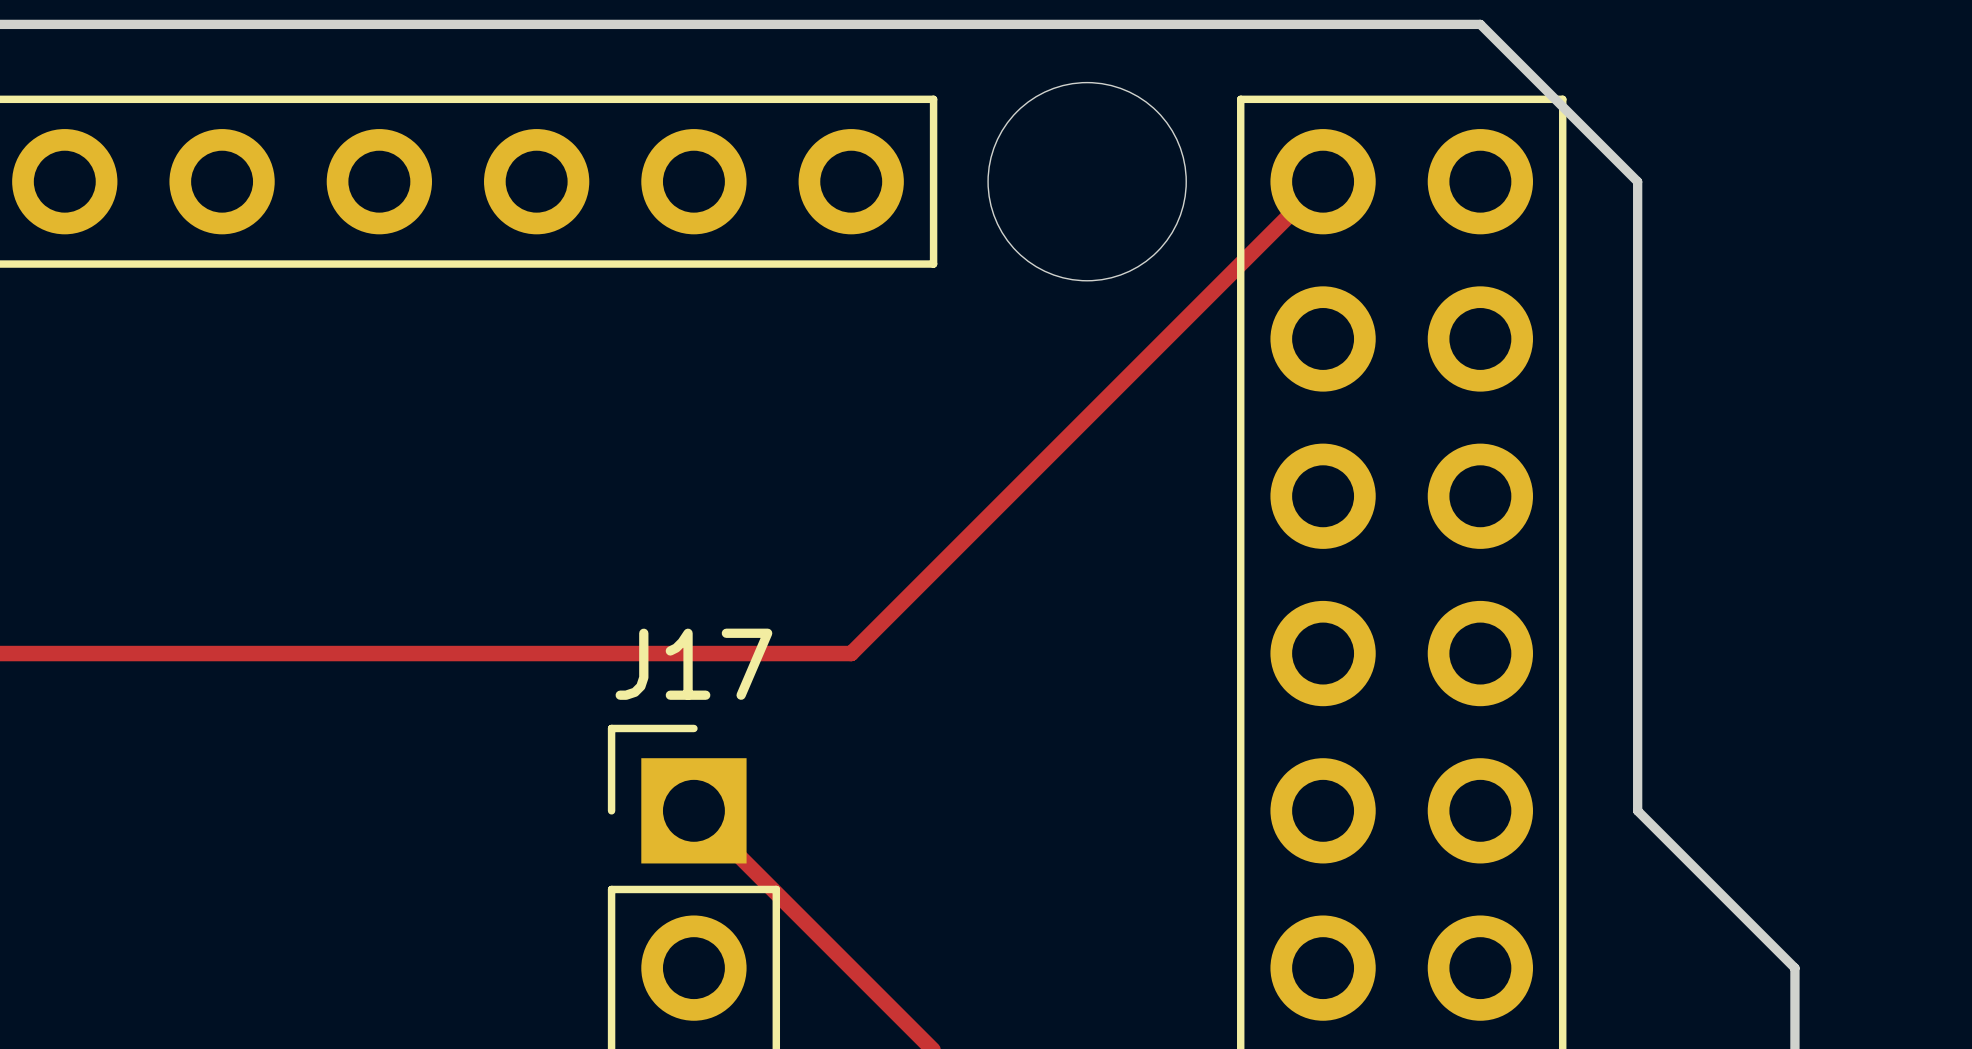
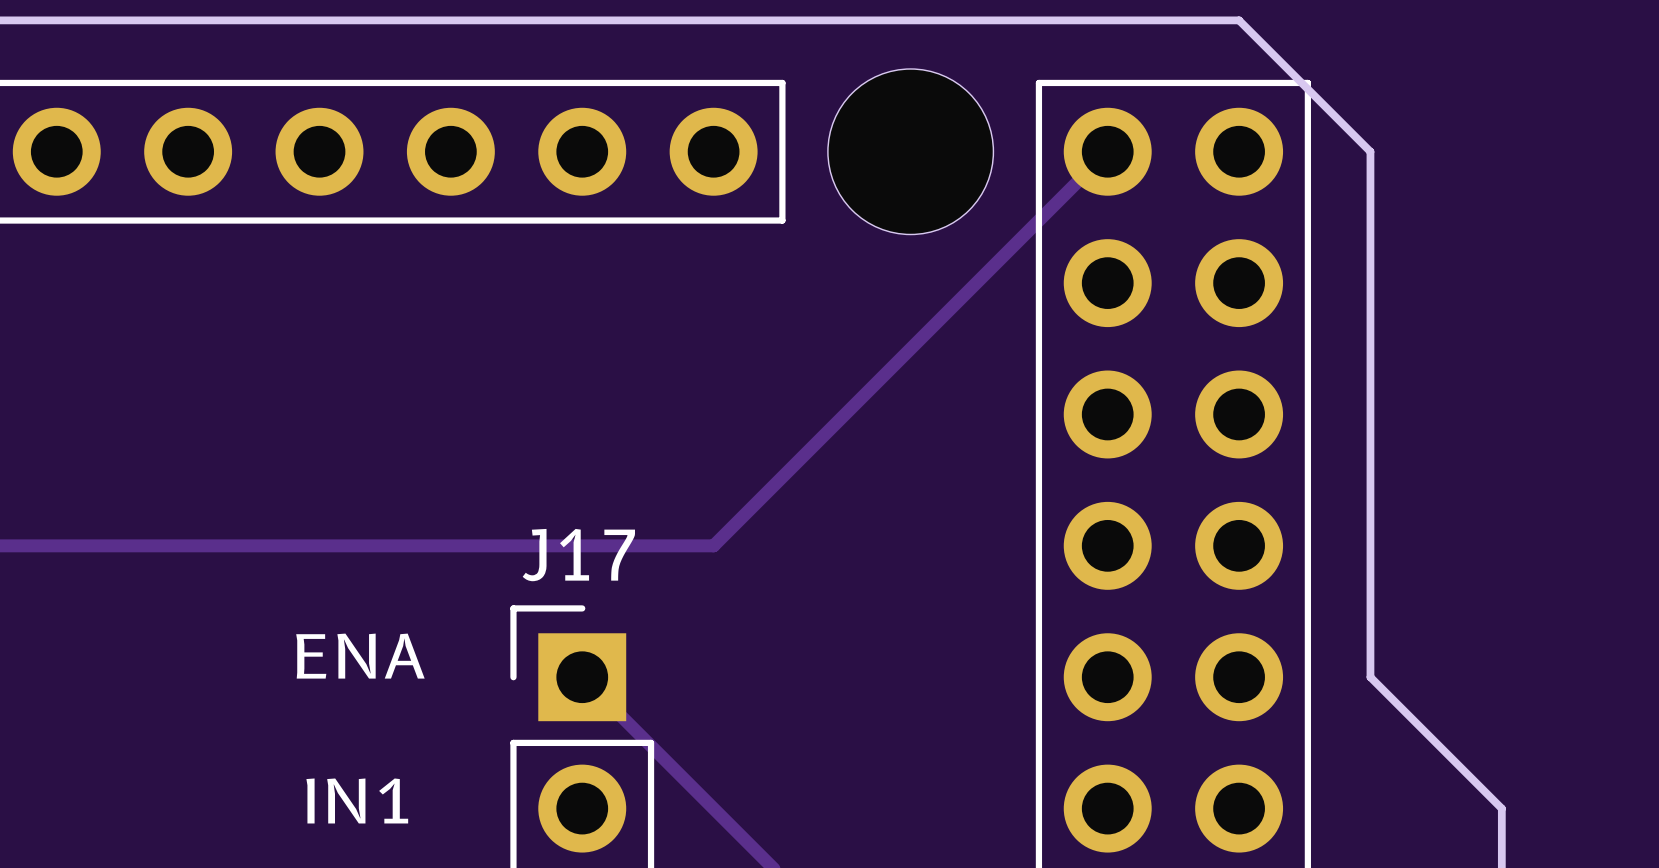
text: none -> ENA (360, 656)
text: none -> IN1 (357, 800)

